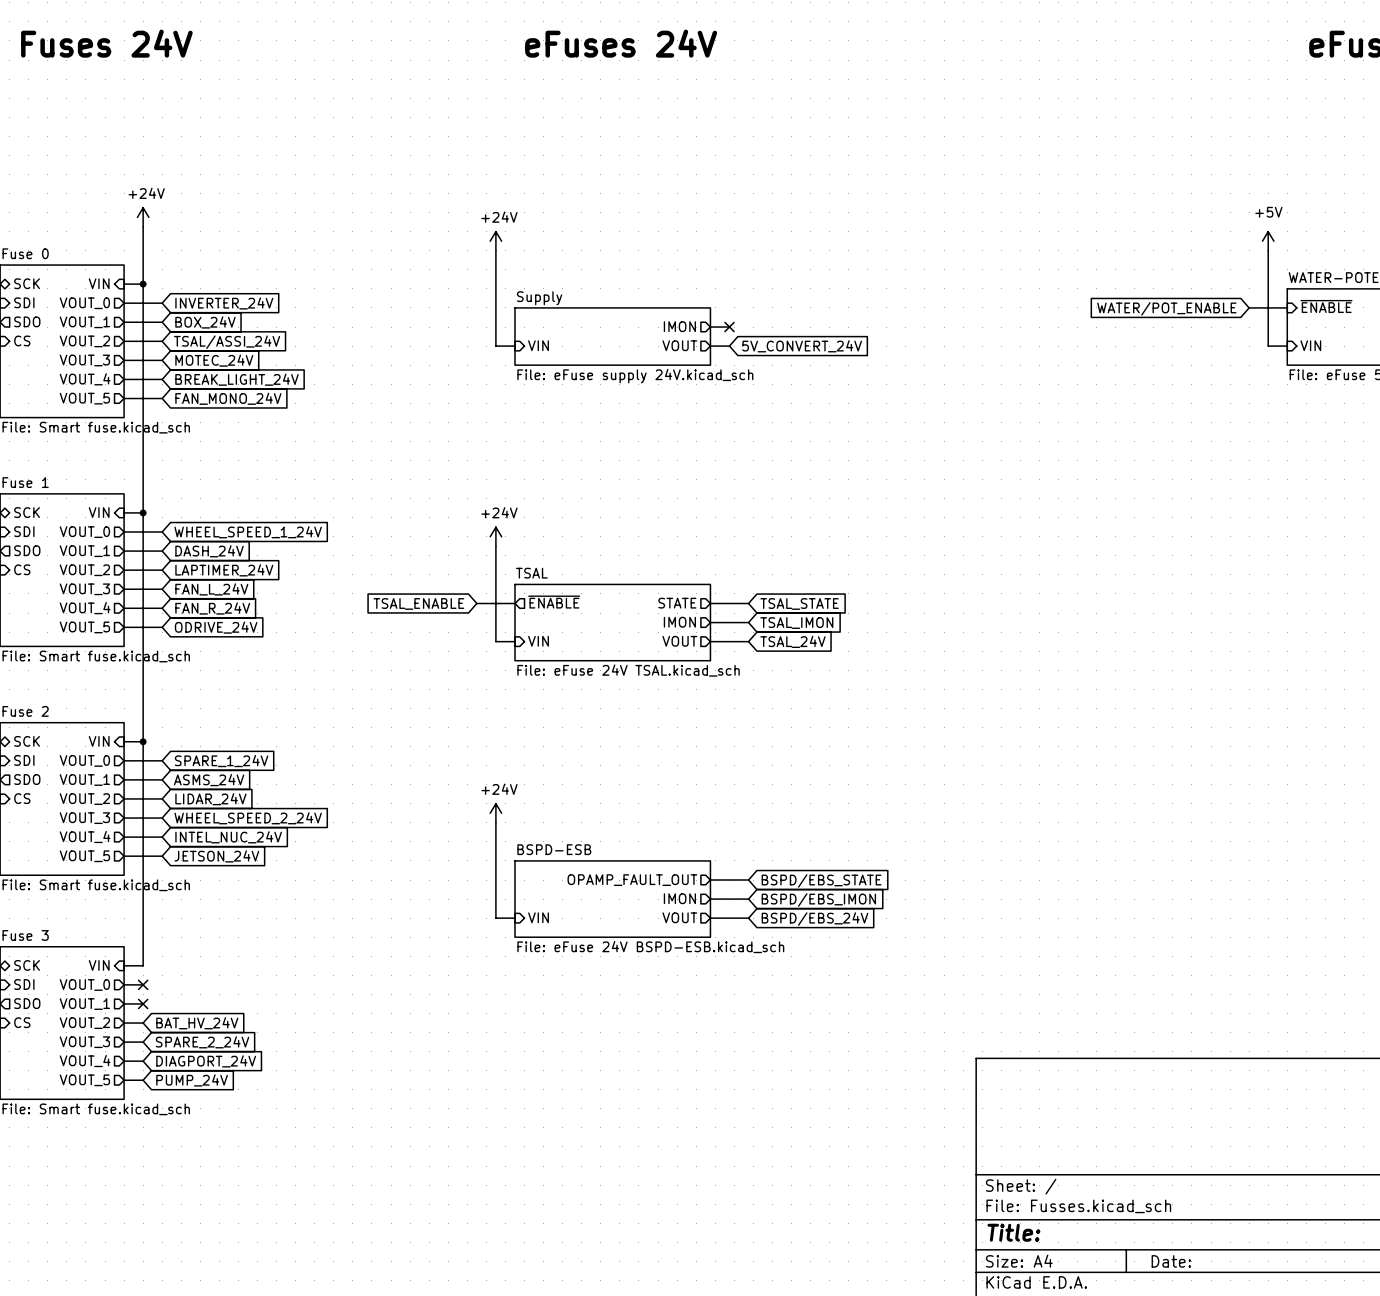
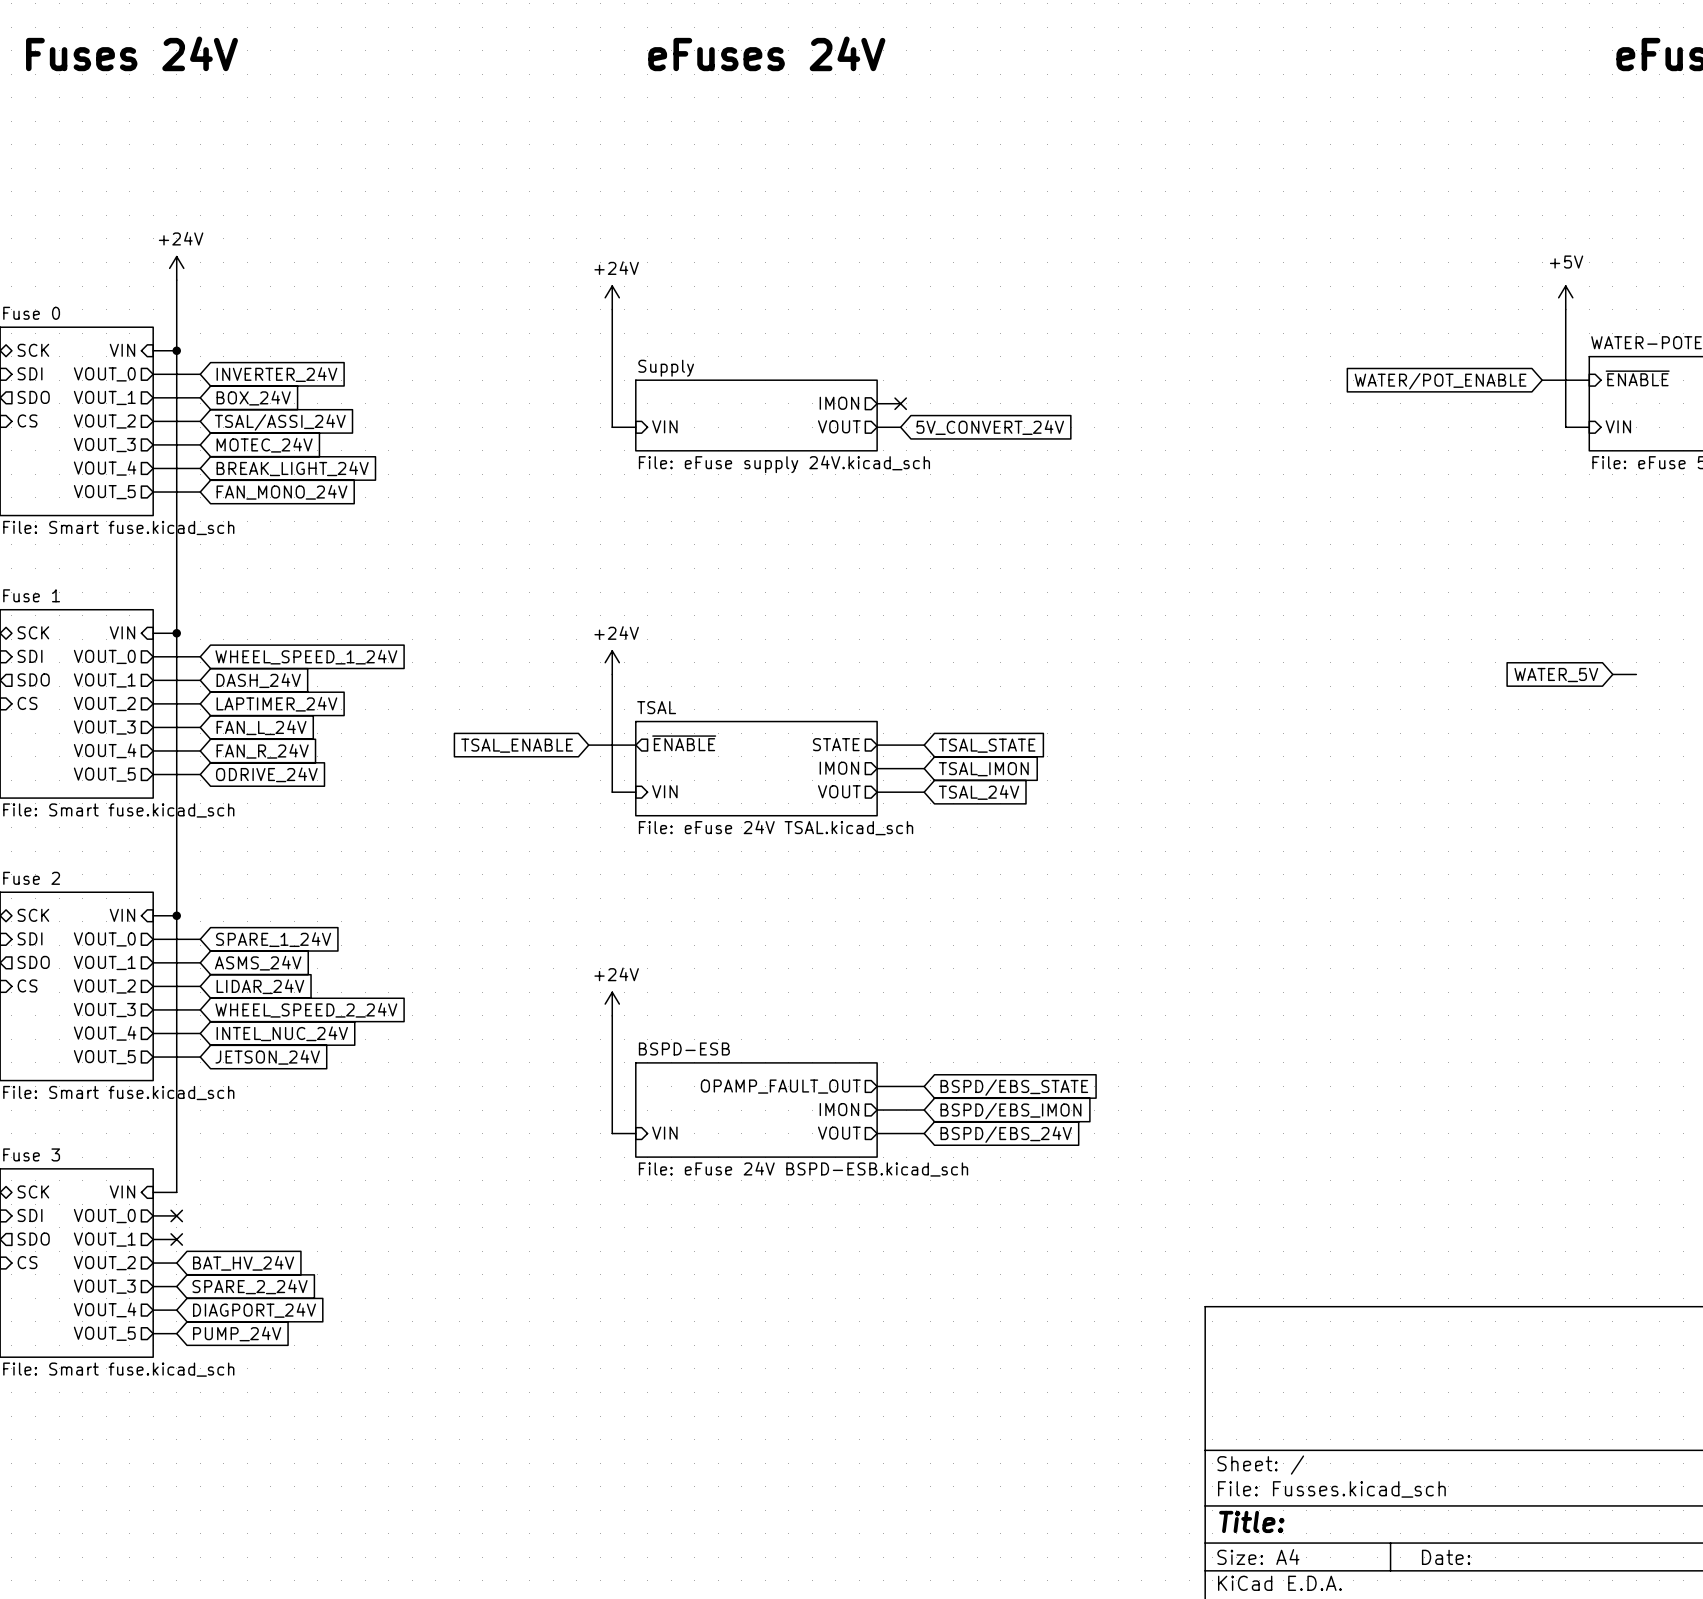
global label: none -> WATER_5V (1556, 675)
wire: none -> (1612, 674) (1636, 674)

